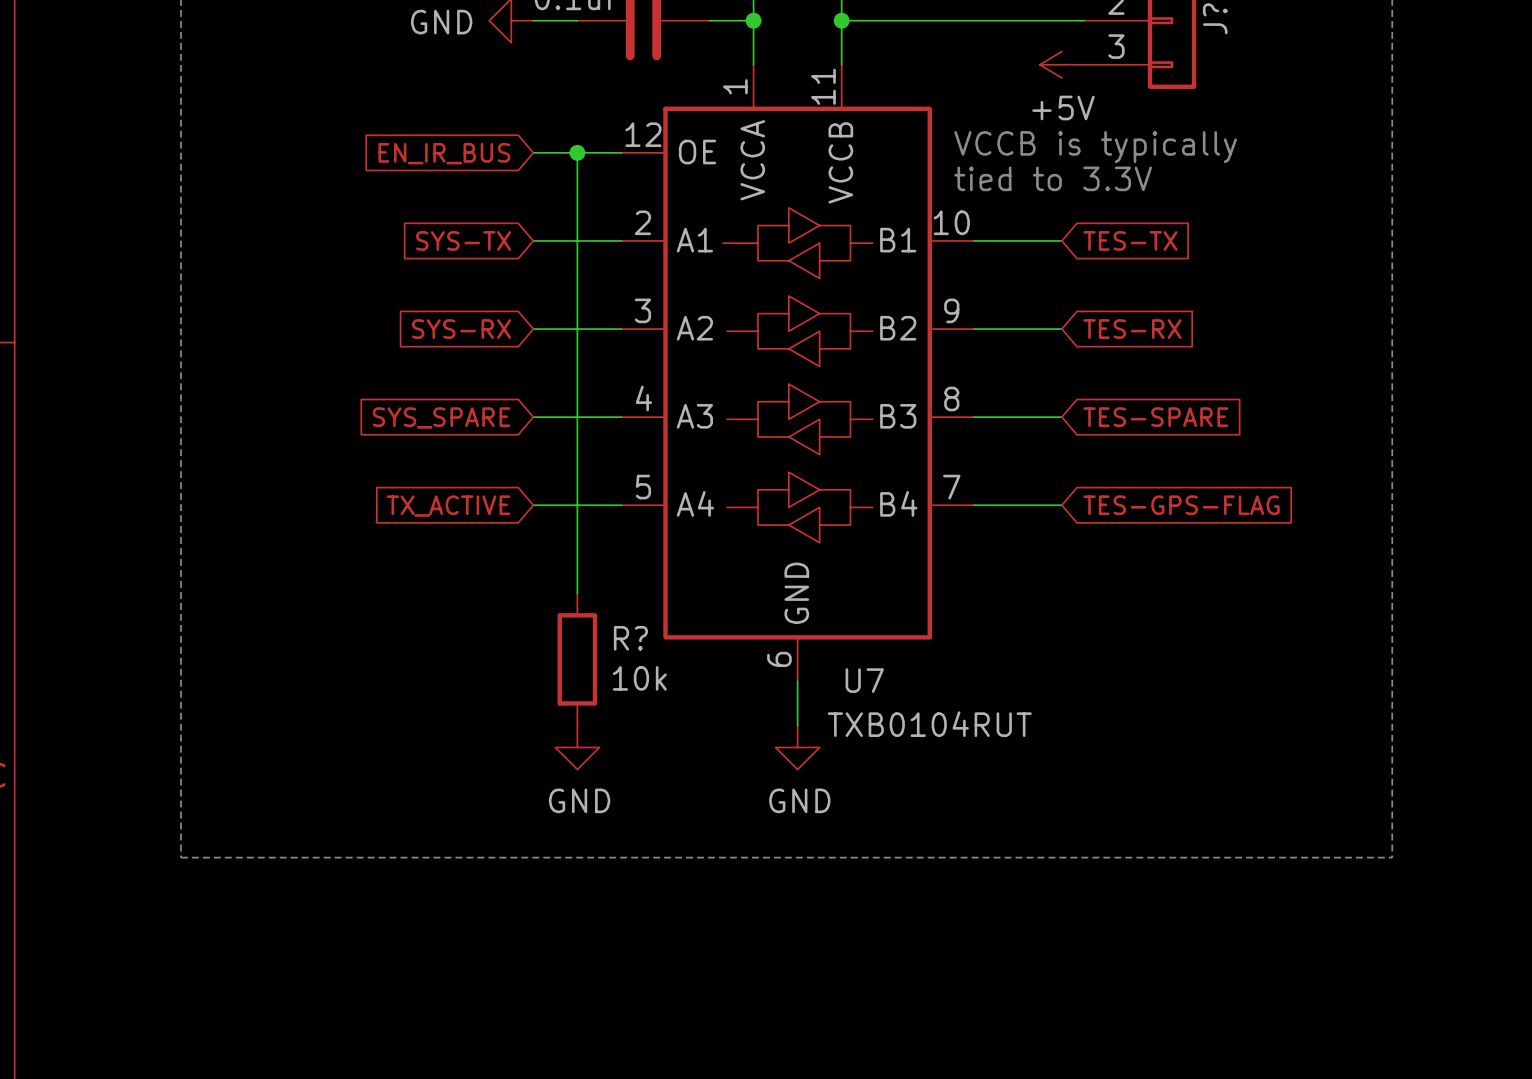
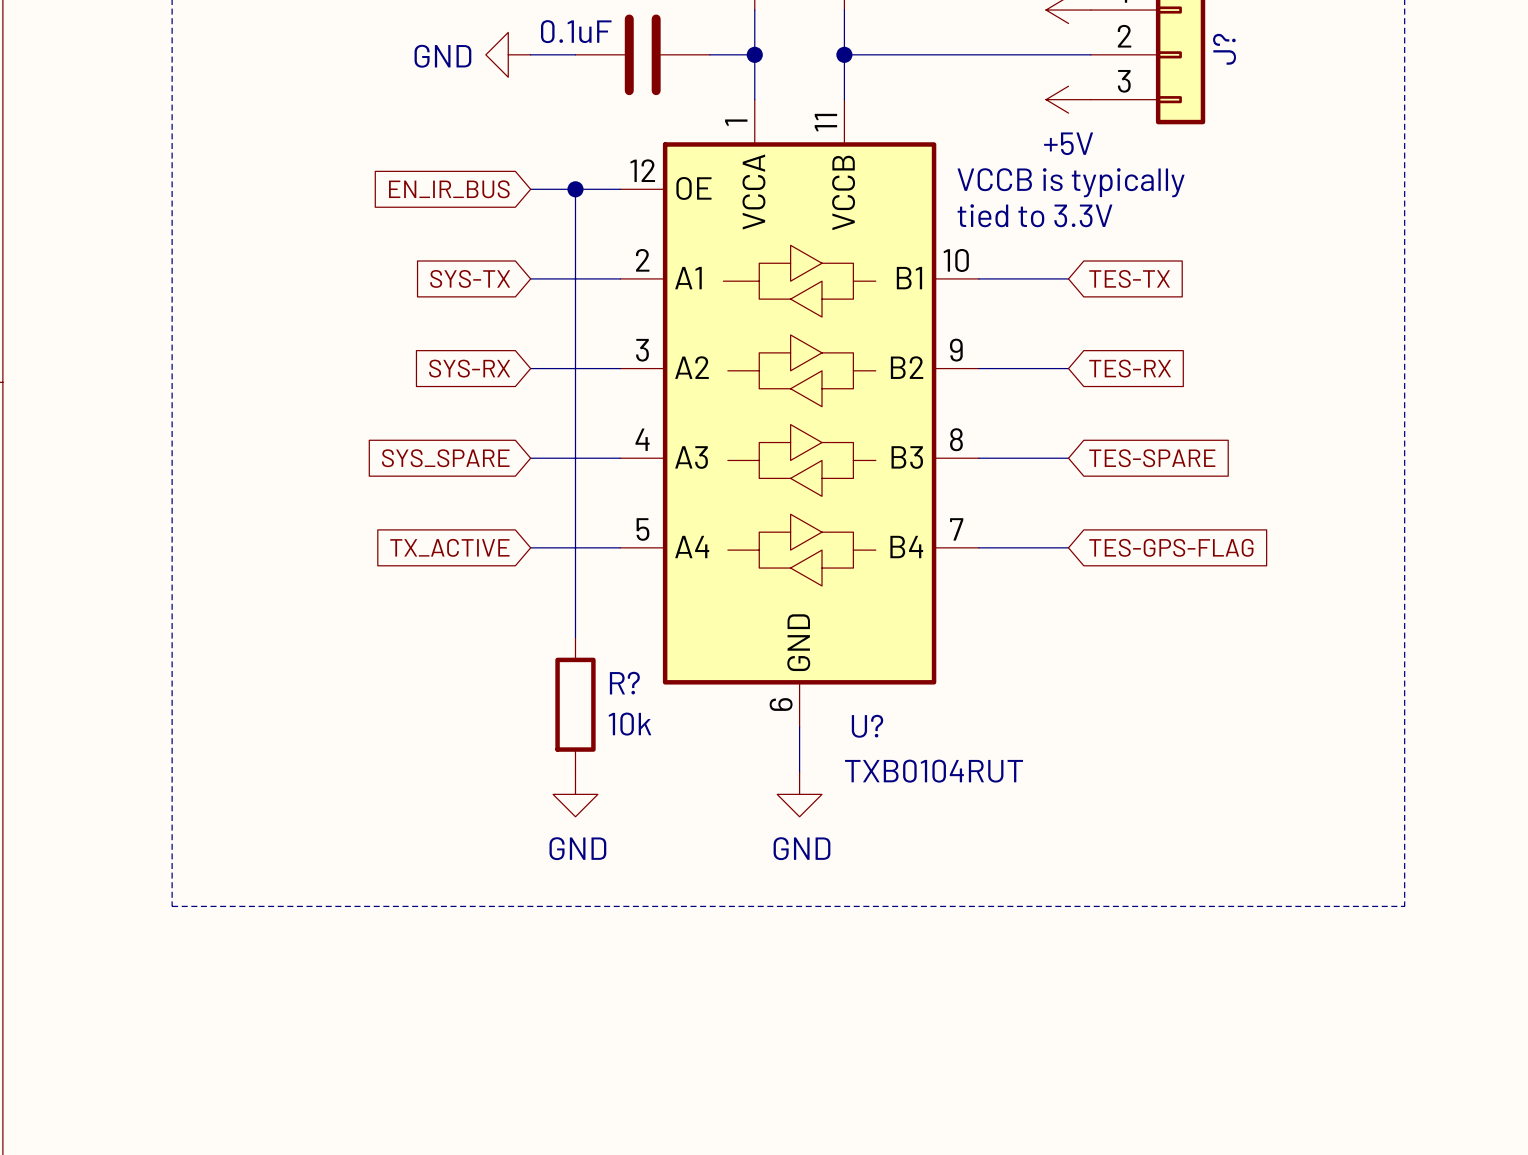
U7 name: U7 (864, 680) -> U? (867, 726)

